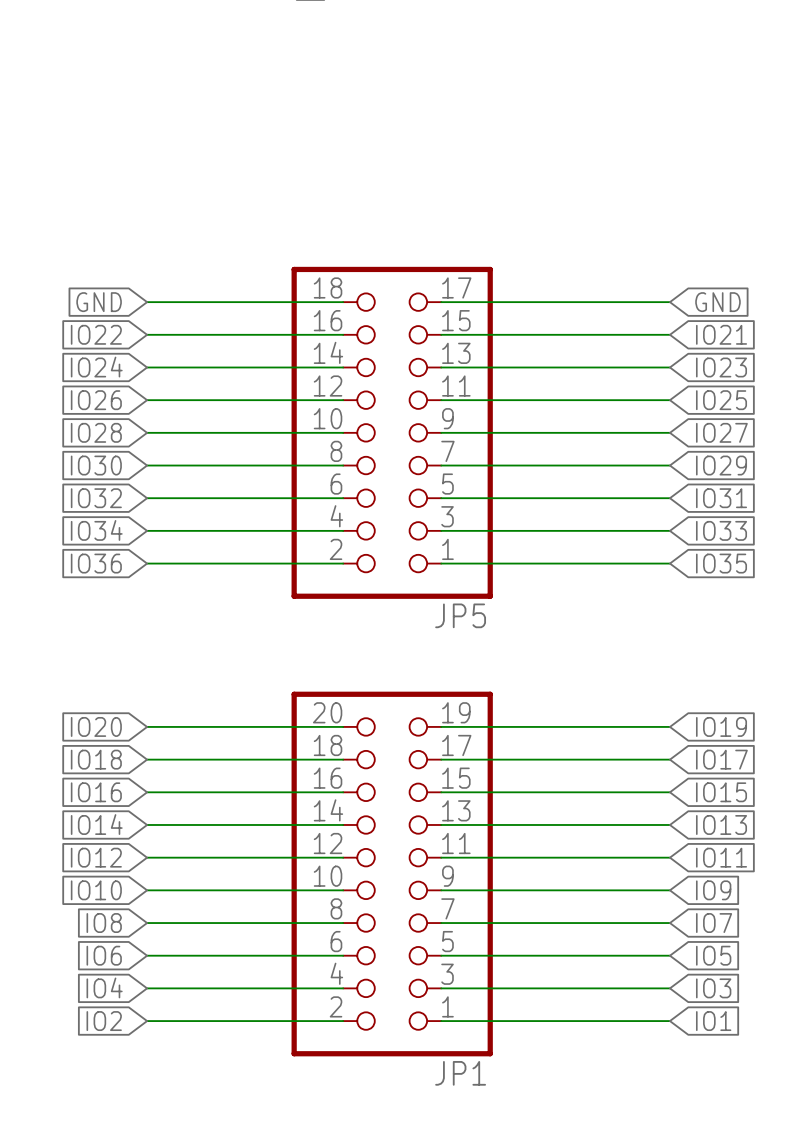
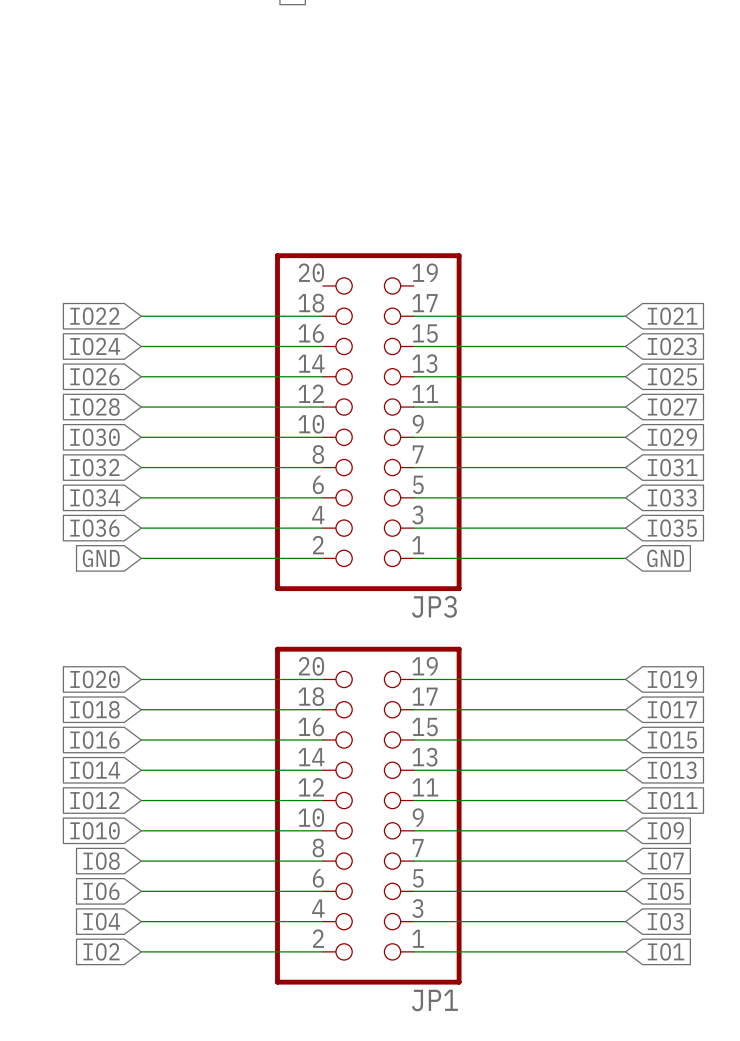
global label position: GND (99, 302) -> GND (101, 558)
wire: (147, 302) (343, 302) -> (141, 558) (322, 558)
wire: (441, 302) (669, 302) -> (413, 558) (625, 558)
global label position: GND (717, 302) -> GND (665, 558)
JP5: (392, 432) -> none
JP3: none -> (368, 422)

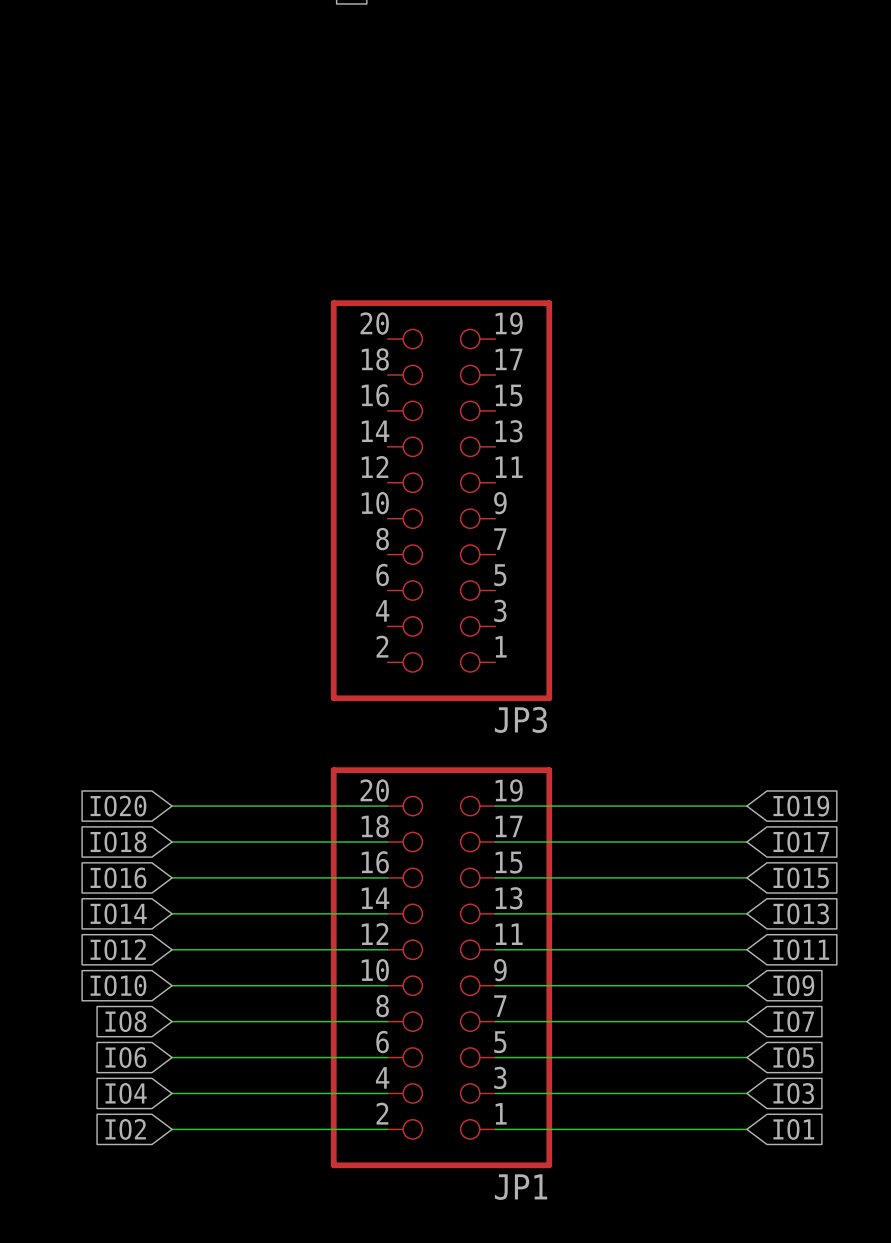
global label: IO22 (94, 316) -> none
wire: (141, 316) (322, 316) -> none
wire: (413, 316) (625, 316) -> none
global label: IO21 (672, 316) -> none
global label: IO24 (95, 346) -> none
wire: (141, 346) (322, 346) -> none
wire: (413, 346) (625, 346) -> none
global label: IO23 (672, 346) -> none
global label: IO26 (94, 376) -> none
wire: (141, 376) (322, 376) -> none
wire: (413, 376) (625, 376) -> none
global label: IO25 (672, 376) -> none
global label: IO28 (95, 407) -> none
wire: (141, 407) (322, 407) -> none
wire: (413, 407) (625, 407) -> none
global label: IO27 (672, 407) -> none
global label: IO30 (95, 437) -> none
wire: (141, 437) (322, 437) -> none
wire: (413, 437) (625, 437) -> none
global label: IO29 (672, 437) -> none
global label: IO32 (94, 467) -> none
wire: (141, 467) (322, 467) -> none
wire: (413, 467) (625, 467) -> none
global label: IO31 (672, 467) -> none
global label: IO34 (95, 497) -> none
wire: (141, 497) (322, 497) -> none
wire: (413, 497) (625, 497) -> none
global label: IO33 (672, 497) -> none
global label: IO36 (94, 528) -> none
wire: (141, 528) (322, 528) -> none
wire: (413, 528) (625, 528) -> none
global label: IO35 (672, 528) -> none
global label: GND (101, 558) -> none
wire: (141, 558) (322, 558) -> none
wire: (413, 558) (625, 558) -> none
global label: GND (665, 558) -> none

